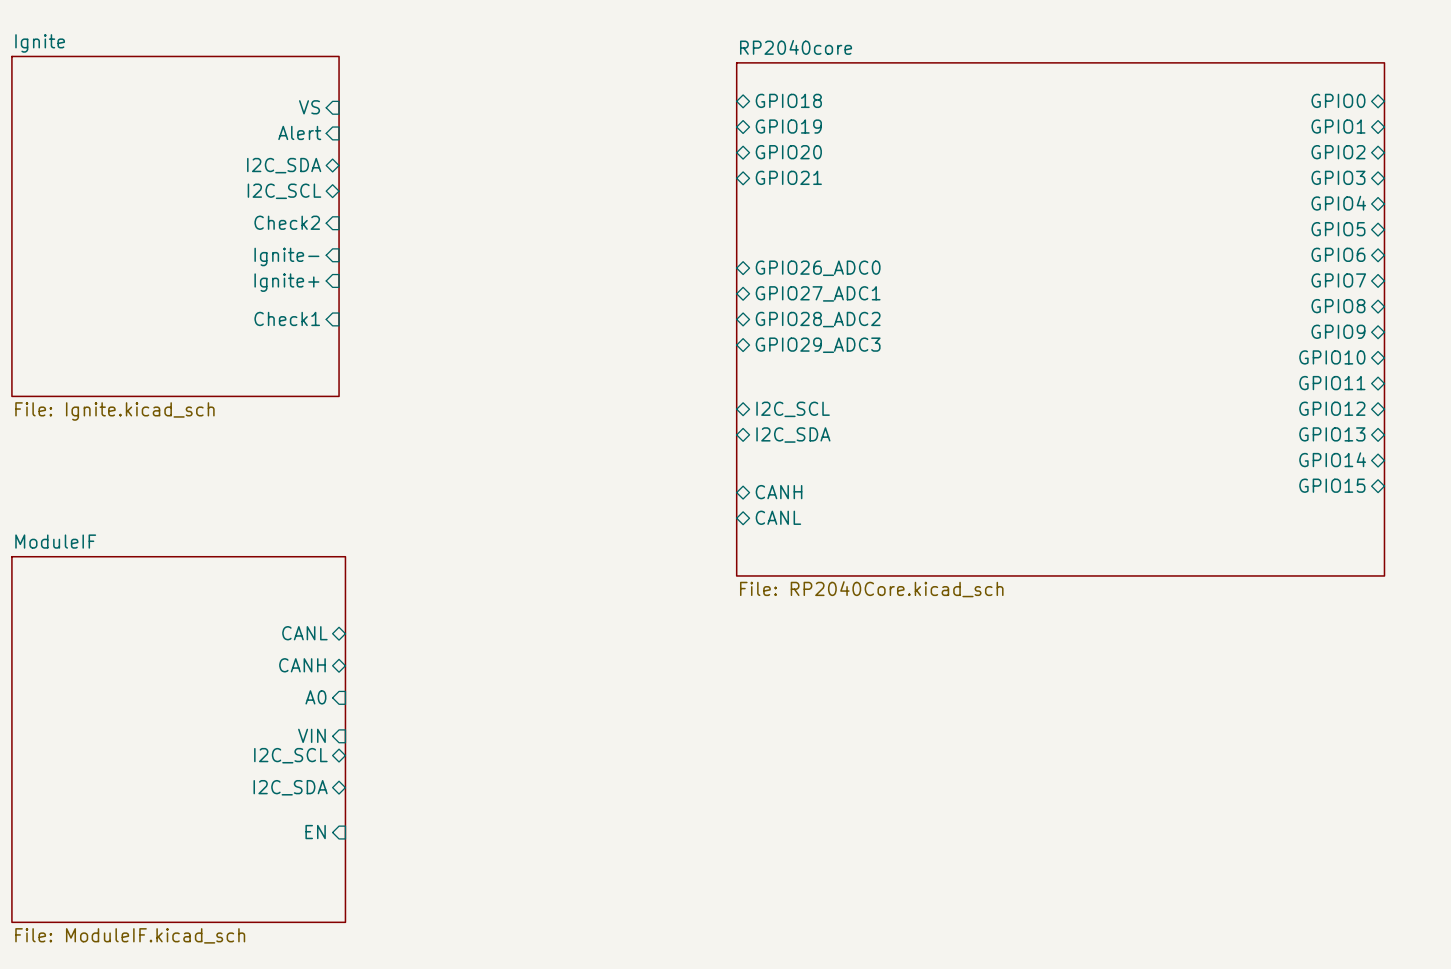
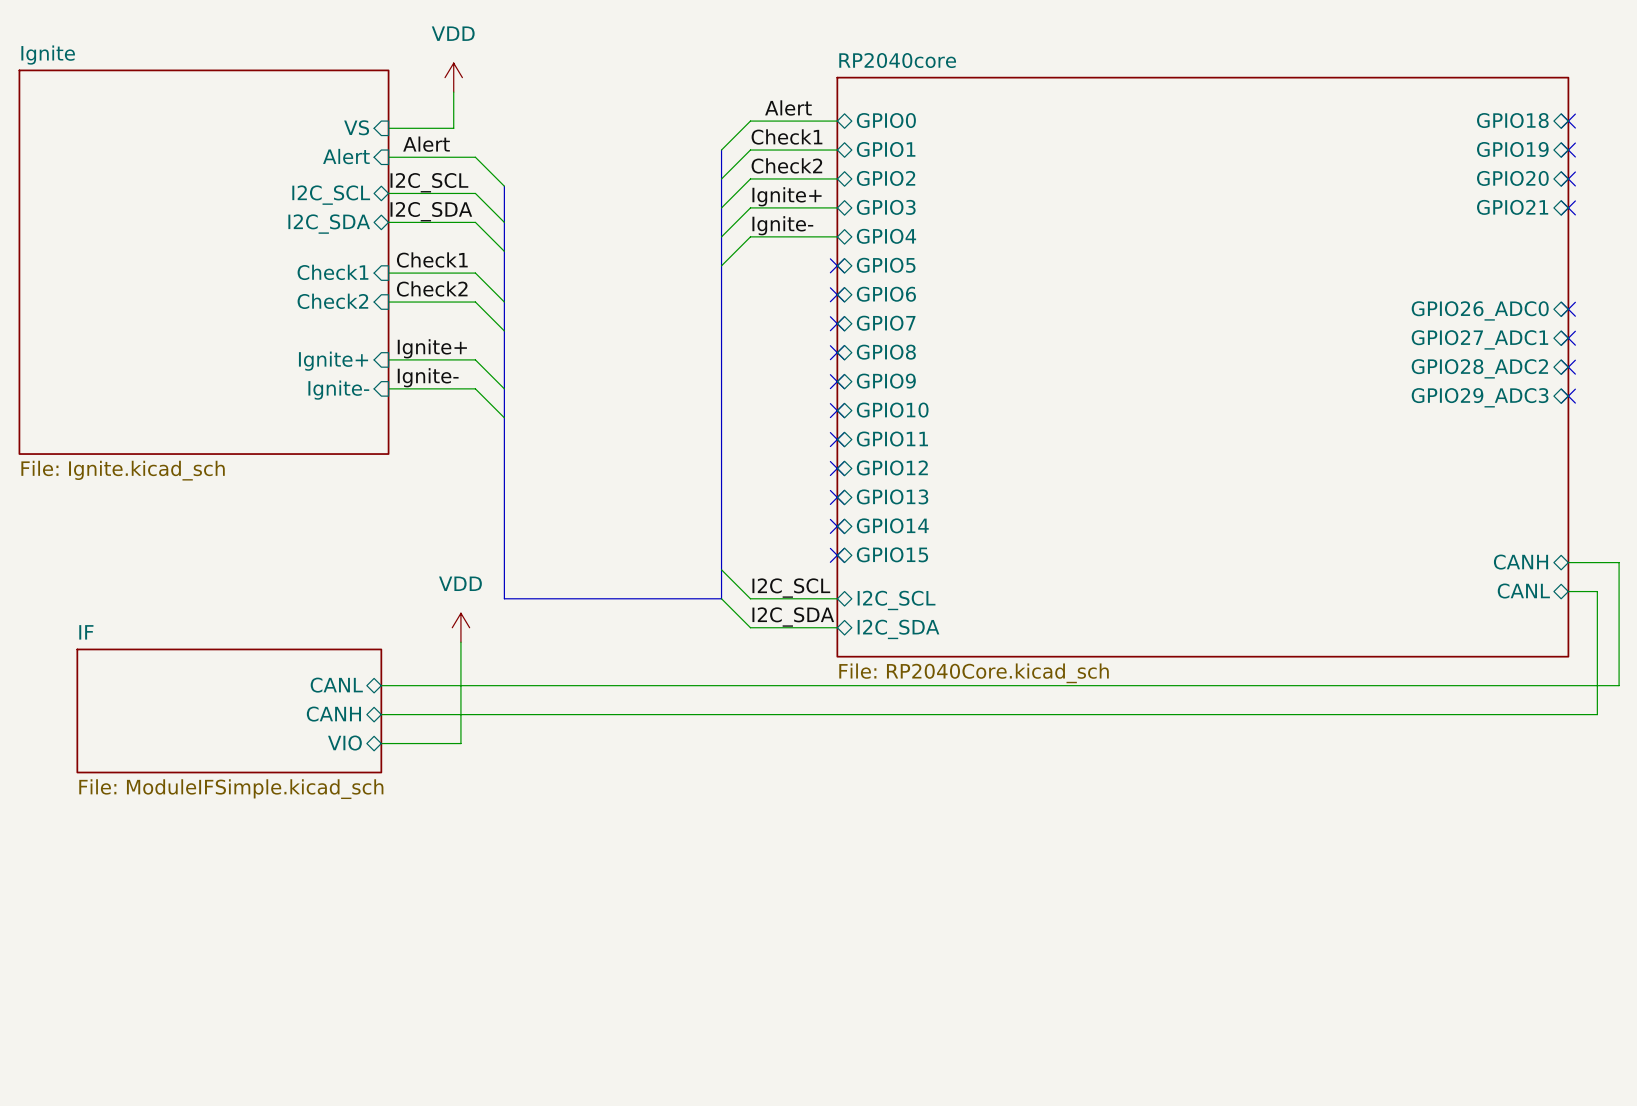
power symbol: none -> VDD (453, 77)
wire: none -> (453, 92) (453, 128) (388, 128)
label: none -> Alert (788, 107)
sheet pin: GPIO18 (788, 100) -> GPIO0 (886, 120)
sheet pin: GPIO0 (1338, 100) -> GPIO18 (1512, 120)
wire: none -> (837, 121) (750, 121) (721, 150)
no-connect mark: none -> (1568, 121)
label: none -> Check1 (786, 136)
label: none -> Alert (426, 144)
sheet pin: GPIO19 (788, 126) -> GPIO1 (886, 149)
sheet pin: GPIO1 (1338, 126) -> GPIO19 (1512, 149)
bus: none -> (721, 150) (721, 598) (504, 598) (504, 186)
wire: none -> (837, 150) (750, 150) (721, 178)
no-connect mark: none -> (1568, 150)
wire: none -> (388, 157) (475, 157) (504, 186)
label: none -> Check2 (786, 165)
wire: none -> (837, 178) (750, 178) (721, 207)
sheet pin: GPIO20 (788, 152) -> GPIO2 (886, 178)
sheet pin: GPIO2 (1338, 152) -> GPIO20 (1512, 178)
no-connect mark: none -> (1568, 178)
label: none -> I2C_SCL (429, 182)
sheet pin: I2C_SDA (284, 165) -> I2C_SCL (331, 195)
wire: none -> (388, 193) (475, 193) (504, 222)
label: none -> Ignite+ (787, 196)
sheet pin: GPIO21 (788, 177) -> GPIO3 (886, 207)
sheet pin: GPIO3 (1338, 177) -> GPIO21 (1512, 207)
wire: none -> (837, 207) (750, 207) (721, 236)
no-connect mark: none -> (1568, 207)
label: none -> I2C_SDA (431, 211)
sheet pin: I2C_SCL (284, 191) -> I2C_SDA (329, 224)
wire: none -> (388, 222) (475, 222) (504, 251)
label: none -> Ignite- (782, 225)
wire: none -> (837, 236) (750, 236) (721, 265)
sheet pin: none -> GPIO4 (886, 236)
sheet pin: GPIO4 (1338, 203) -> none
sheet pin position: Check2 (287, 222) -> Check2 (332, 301)
label: none -> Check1 (432, 259)
no-connect mark: none -> (837, 265)
sheet pin: none -> GPIO5 (886, 265)
sheet pin: GPIO5 (1338, 229) -> none
wire: none -> (388, 273) (475, 273) (504, 302)
label: none -> Check2 (432, 288)
sheet pin: GPIO6 (1338, 254) -> GPIO26_ADC0 (1480, 310)
no-connect mark: none -> (837, 294)
sheet pin position: Ignite- (286, 256) -> Ignite- (338, 390)
wire: none -> (388, 302) (475, 302) (504, 330)
sheet pin: GPIO26_ADC0 (818, 268) -> GPIO6 (886, 294)
no-connect mark: none -> (1568, 309)
no-connect mark: none -> (837, 323)
sheet pin: GPIO7 (1338, 280) -> GPIO27_ADC1 (1479, 339)
sheet pin position: Ignite+ (286, 282) -> Ignite+ (333, 361)
sheet pin: GPIO27_ADC1 (818, 293) -> GPIO7 (886, 323)
no-connect mark: none -> (1568, 338)
label: none -> Ignite+ (432, 348)
no-connect mark: none -> (837, 352)
sheet pin: GPIO8 (1338, 306) -> GPIO28_ADC2 (1479, 368)
wire: none -> (388, 359) (475, 359) (504, 388)
sheet pin position: Check1 (287, 318) -> Check1 (332, 272)
sheet pin: GPIO28_ADC2 (818, 319) -> GPIO8 (886, 352)
no-connect mark: none -> (1568, 367)
label: none -> Ignite- (428, 377)
sheet pin: GPIO9 (1338, 331) -> GPIO29_ADC3 (1480, 397)
no-connect mark: none -> (837, 381)
wire: none -> (388, 388) (475, 388) (504, 417)
sheet pin: GPIO29_ADC3 (818, 345) -> GPIO9 (886, 381)
no-connect mark: none -> (1568, 396)
no-connect mark: none -> (837, 410)
sheet pin: none -> GPIO10 (892, 410)
sheet pin: GPIO10 (1332, 357) -> none
no-connect mark: none -> (837, 439)
sheet pin: none -> GPIO11 (892, 439)
sheet pin: GPIO11 (1332, 383) -> none
sheet pin: GPIO12 (1332, 408) -> none
no-connect mark: none -> (837, 468)
sheet pin: I2C_SCL (793, 409) -> GPIO12 (892, 467)
no-connect mark: none -> (837, 497)
sheet pin: GPIO13 (1332, 434) -> none
sheet pin: I2C_SDA (793, 435) -> GPIO13 (892, 496)
sheet pin: none -> GPIO14 (892, 525)
sheet pin: GPIO14 (1332, 459) -> none
no-connect mark: none -> (837, 526)
sheet pin: GPIO15 (1332, 485) -> CANH (1520, 562)
no-connect mark: none -> (837, 555)
sheet pin: CANH (779, 492) -> GPIO15 (892, 554)
wire: none -> (1568, 562) (1619, 562) (1619, 685) (381, 685)
wire: none -> (721, 569) (750, 598) (837, 598)
label: none -> I2C_SCL (791, 588)
sheet pin: CANL (778, 517) -> I2C_SCL (896, 600)
sheet pin: none -> CANL (1523, 591)
wire: none -> (1568, 591) (1597, 591) (1597, 714) (381, 714)
wire: none -> (721, 598) (750, 627) (837, 627)
label: none -> I2C_SDA (793, 617)
power symbol: none -> VDD (460, 627)
sheet pin: none -> I2C_SDA (898, 629)
wire: none -> (460, 642) (460, 743) (381, 743)
sheet IF: none -> File: ModuleIFSimple.kicad_sch (229, 710)
sheet pin position: CANL (304, 633) -> CANL (336, 685)
sheet pin: none -> VIO (344, 743)
sheet pin position: CANH (302, 665) -> CANH (333, 714)
sheet pin: A0 (315, 697) -> none
sheet pin: VIN (311, 735) -> none
sheet ModuleIF: File: ModuleIF.kicad_sch (178, 739) -> none
sheet pin: I2C_SCL (290, 755) -> none
sheet pin: I2C_SDA (290, 787) -> none
sheet pin: EN (315, 832) -> none

